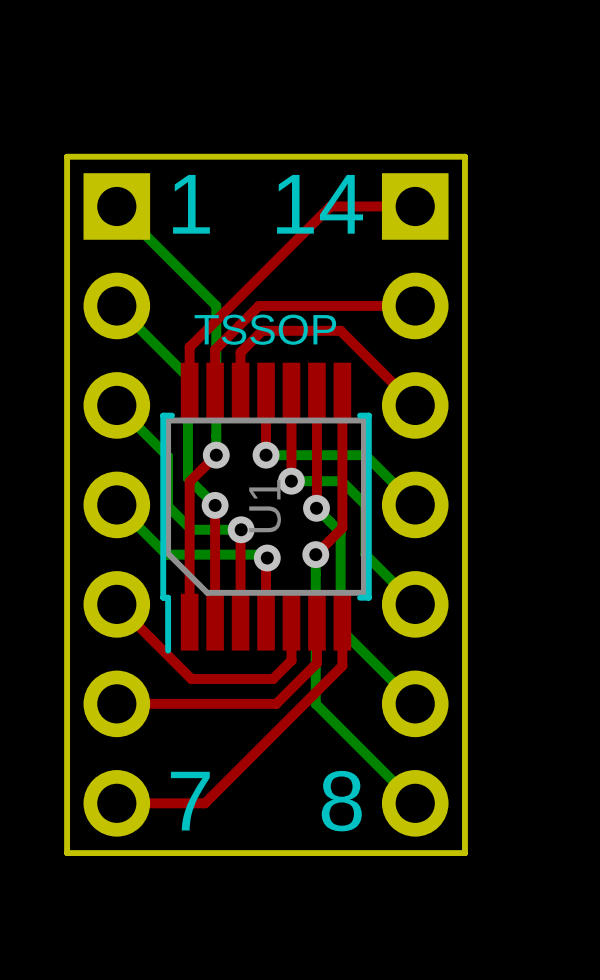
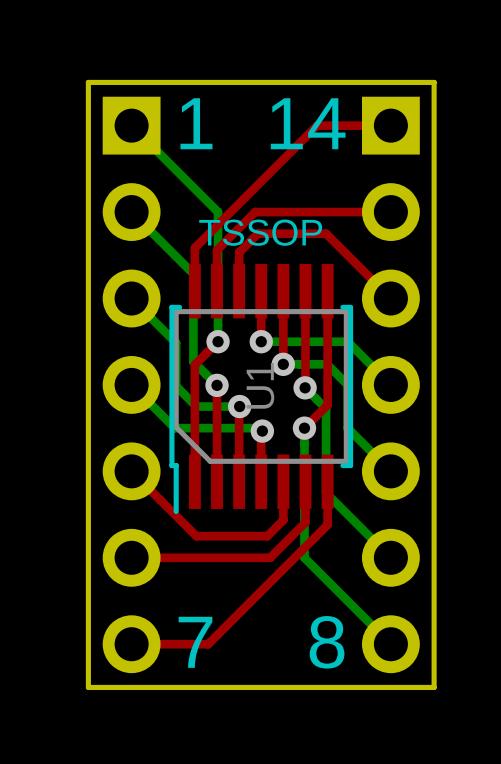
U1 footprint: [160, 362, 372, 654] -> [169, 263, 354, 515]

